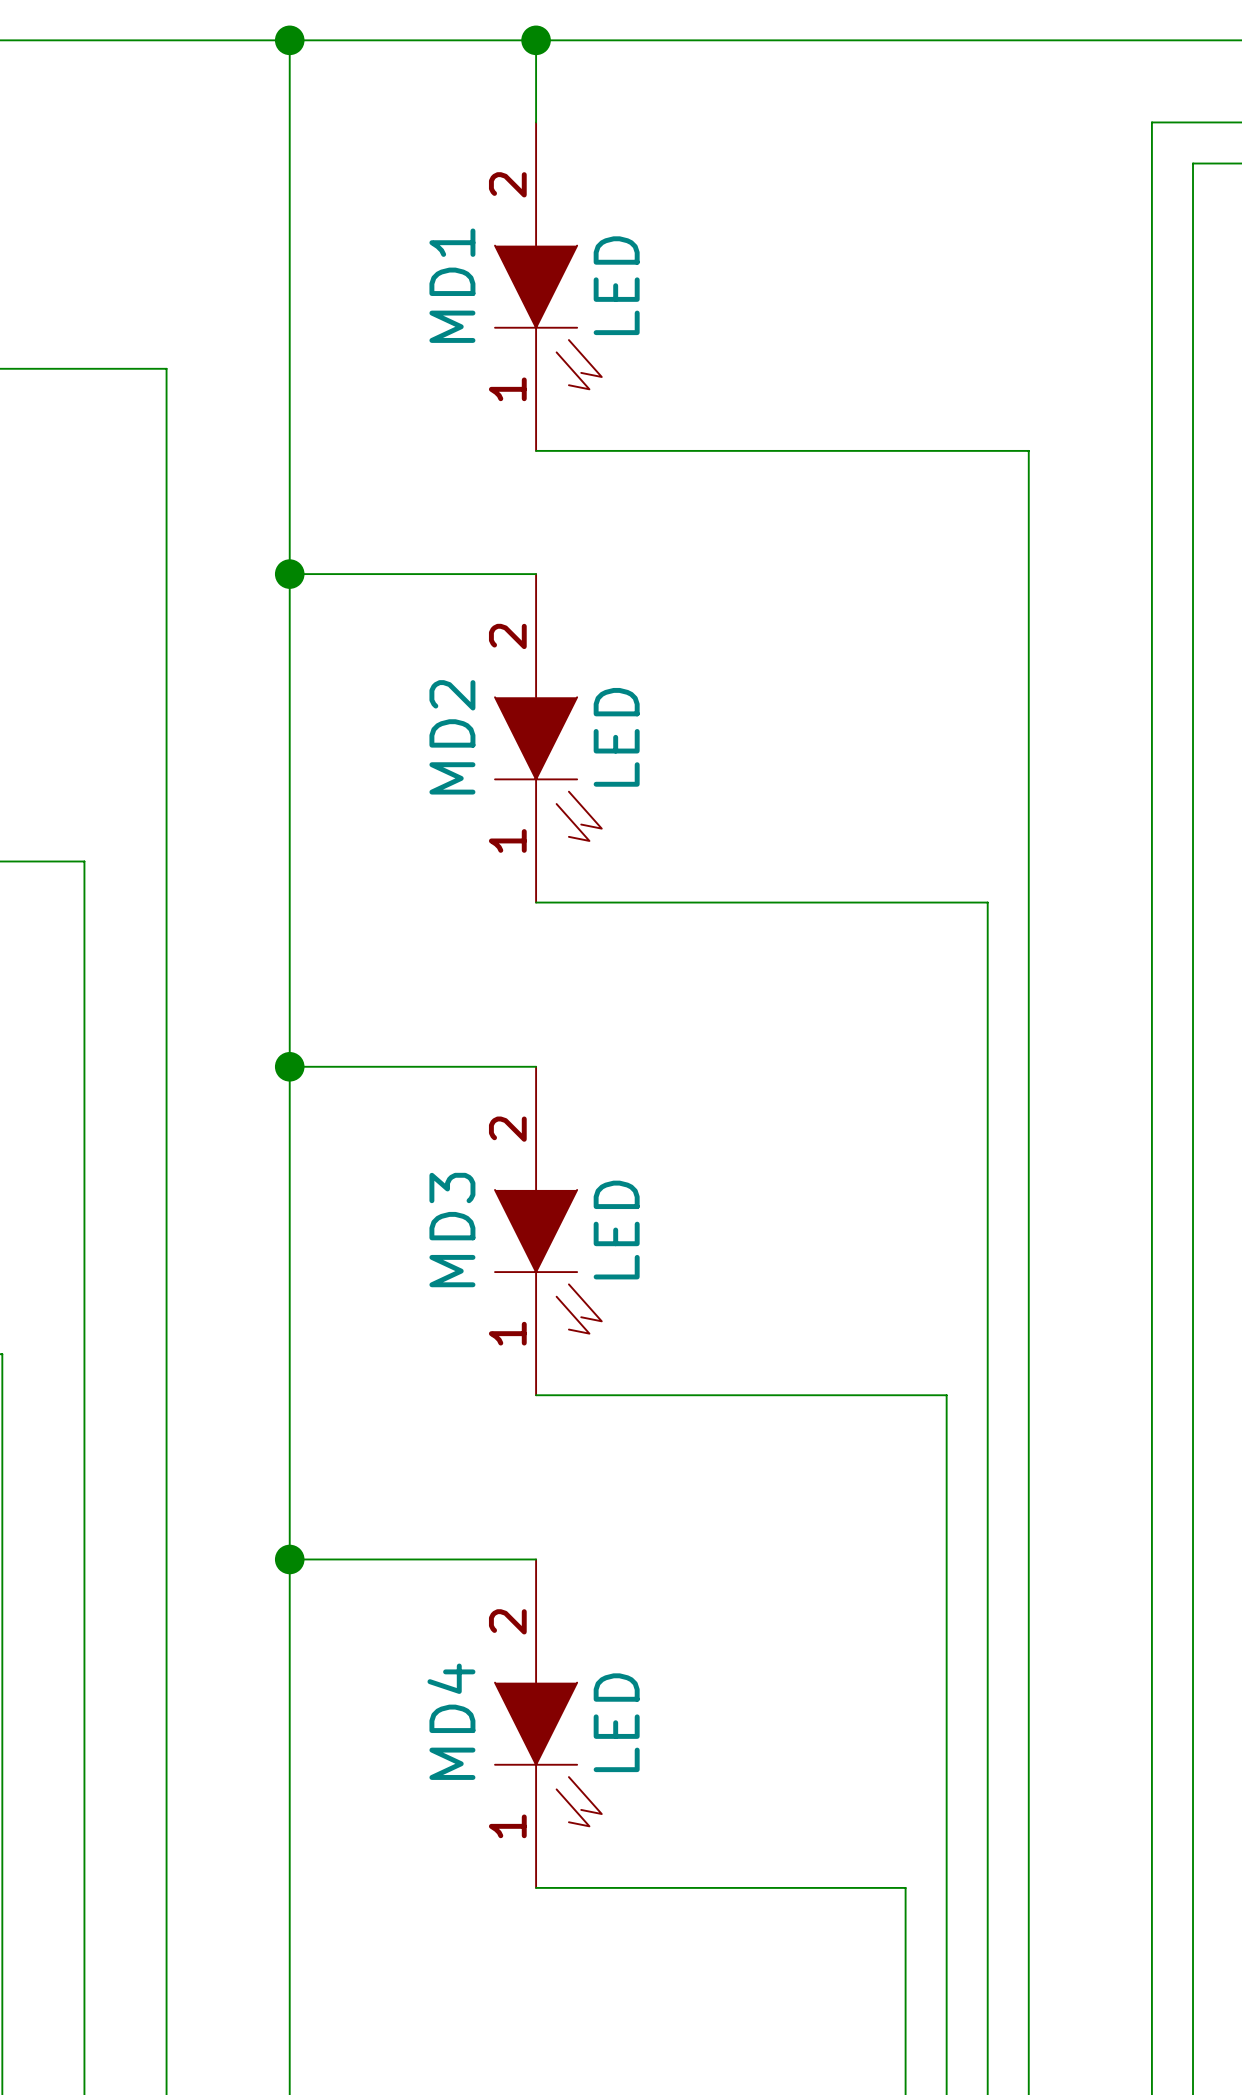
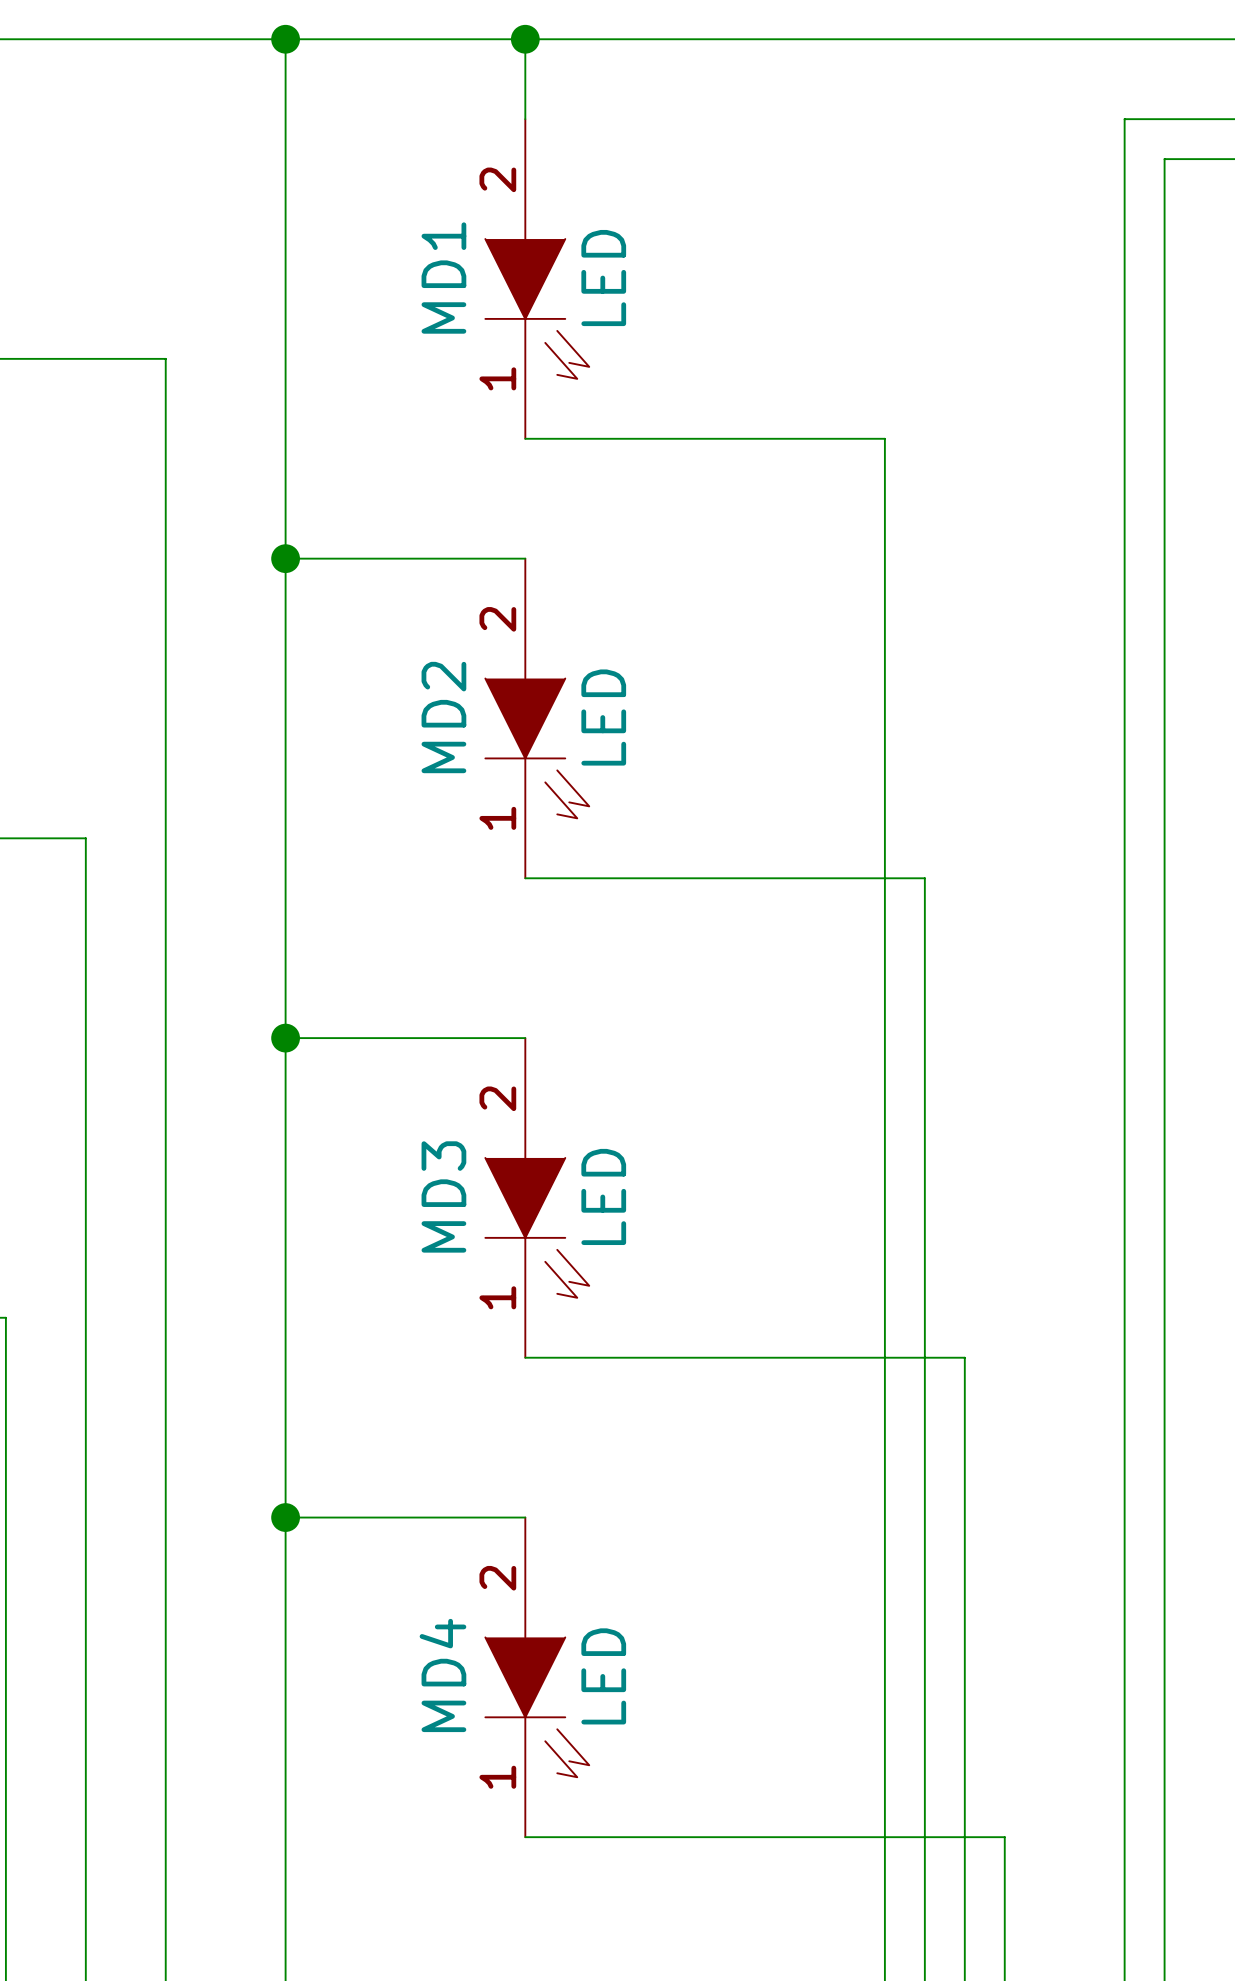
wire: (905, 450) (1028, 450) (1028, 1887) -> (884, 438) (884, 1837) (1004, 1837)
wire: (946, 902) (987, 902) (987, 1395) -> (924, 878) (924, 1357) (964, 1357)

